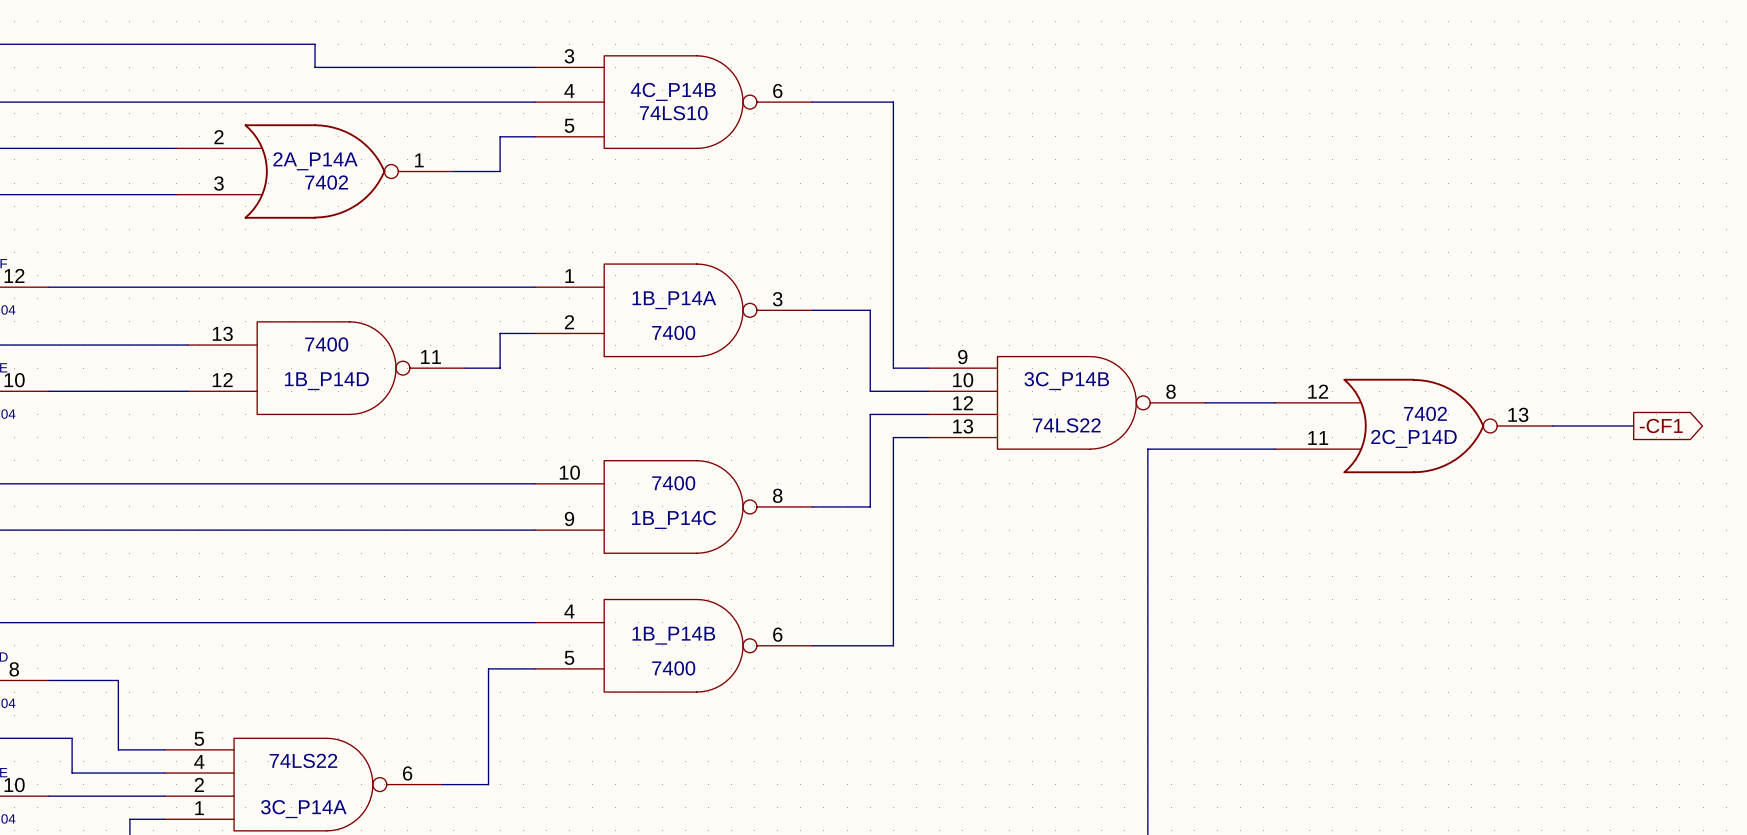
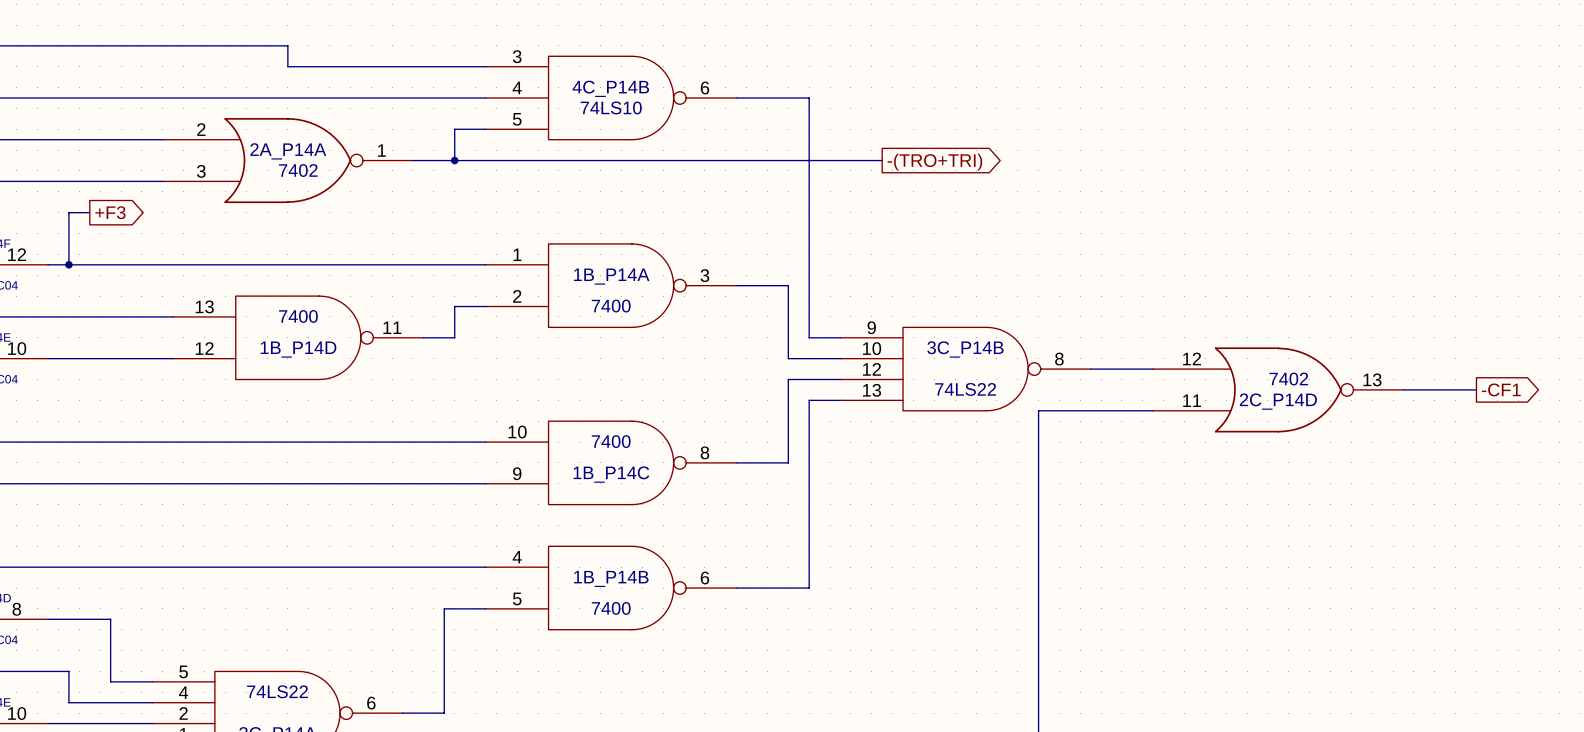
wire: none -> (454, 160) (882, 160)
junction: none -> (454, 160)
global label: none -> -(TRO+TRI) (934, 162)
wire: none -> (89, 212) (68, 212) (68, 264)
global label: none -> +F3 (110, 212)
junction: none -> (68, 264)

